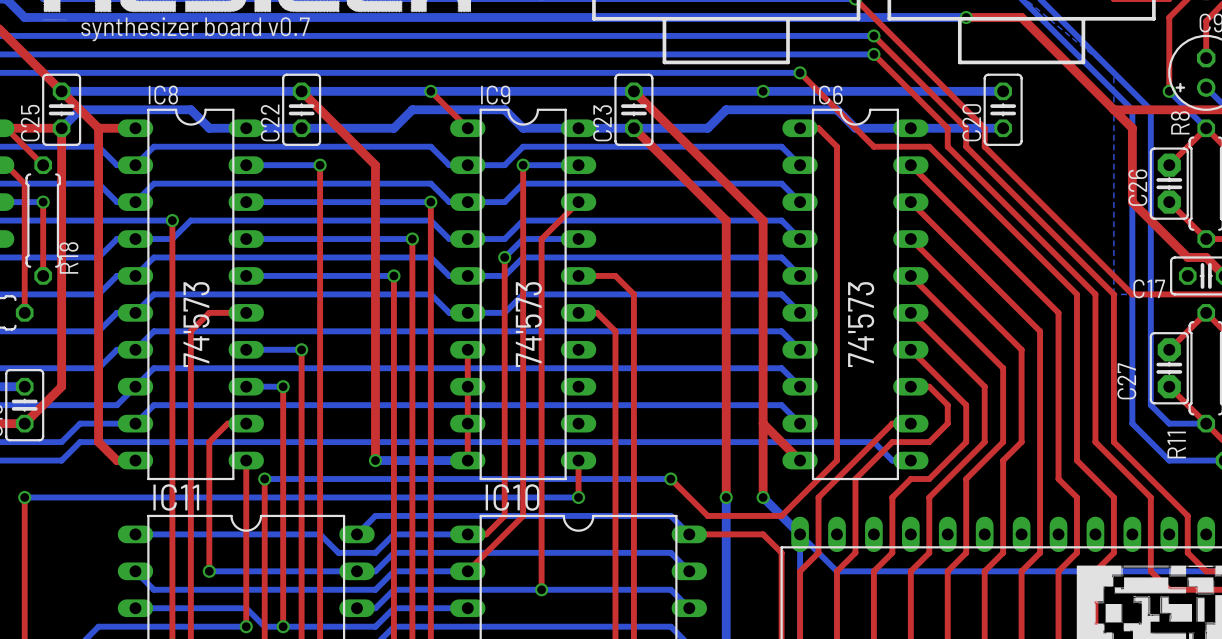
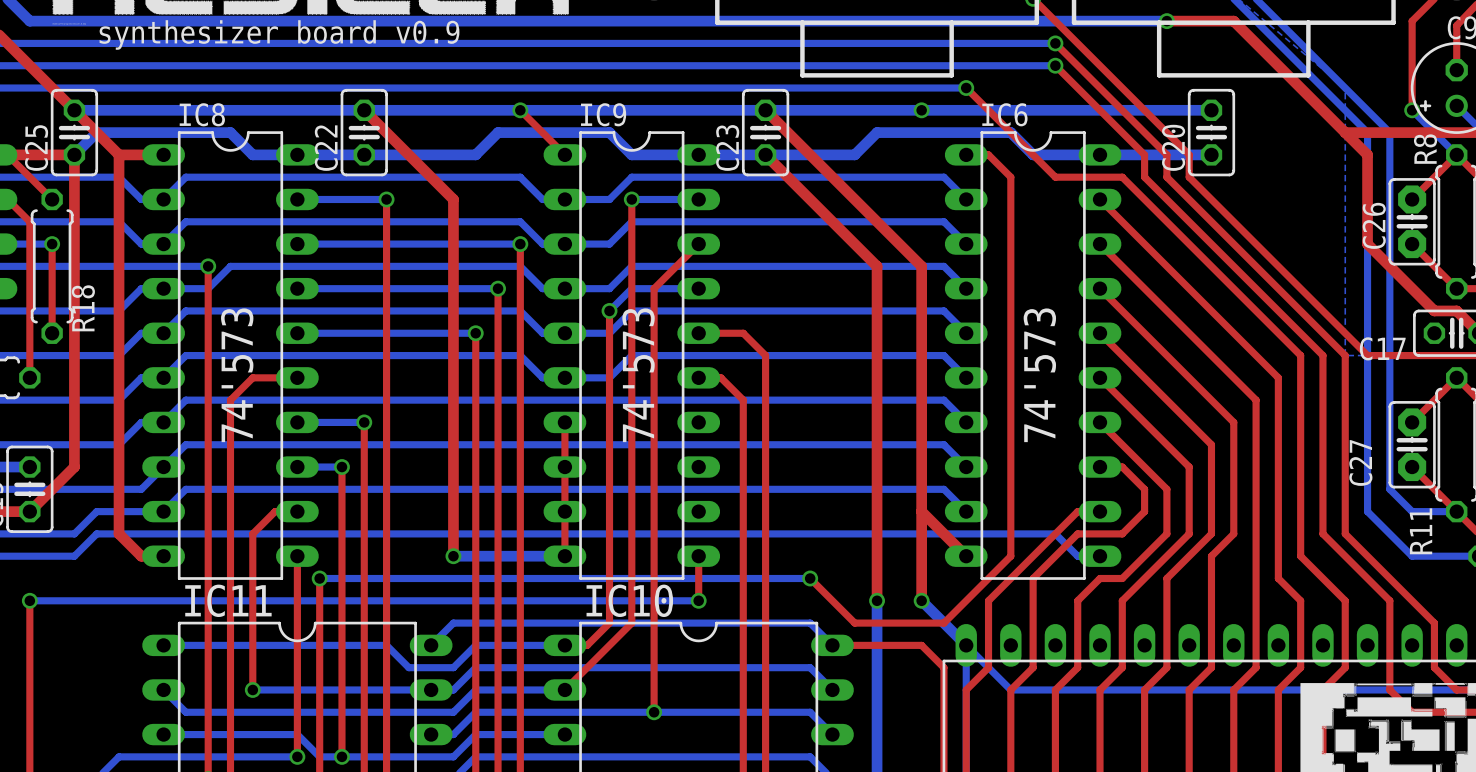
text: synthesizer board v0.7 (195, 29) -> synthesizer board v0.9 (279, 34)

